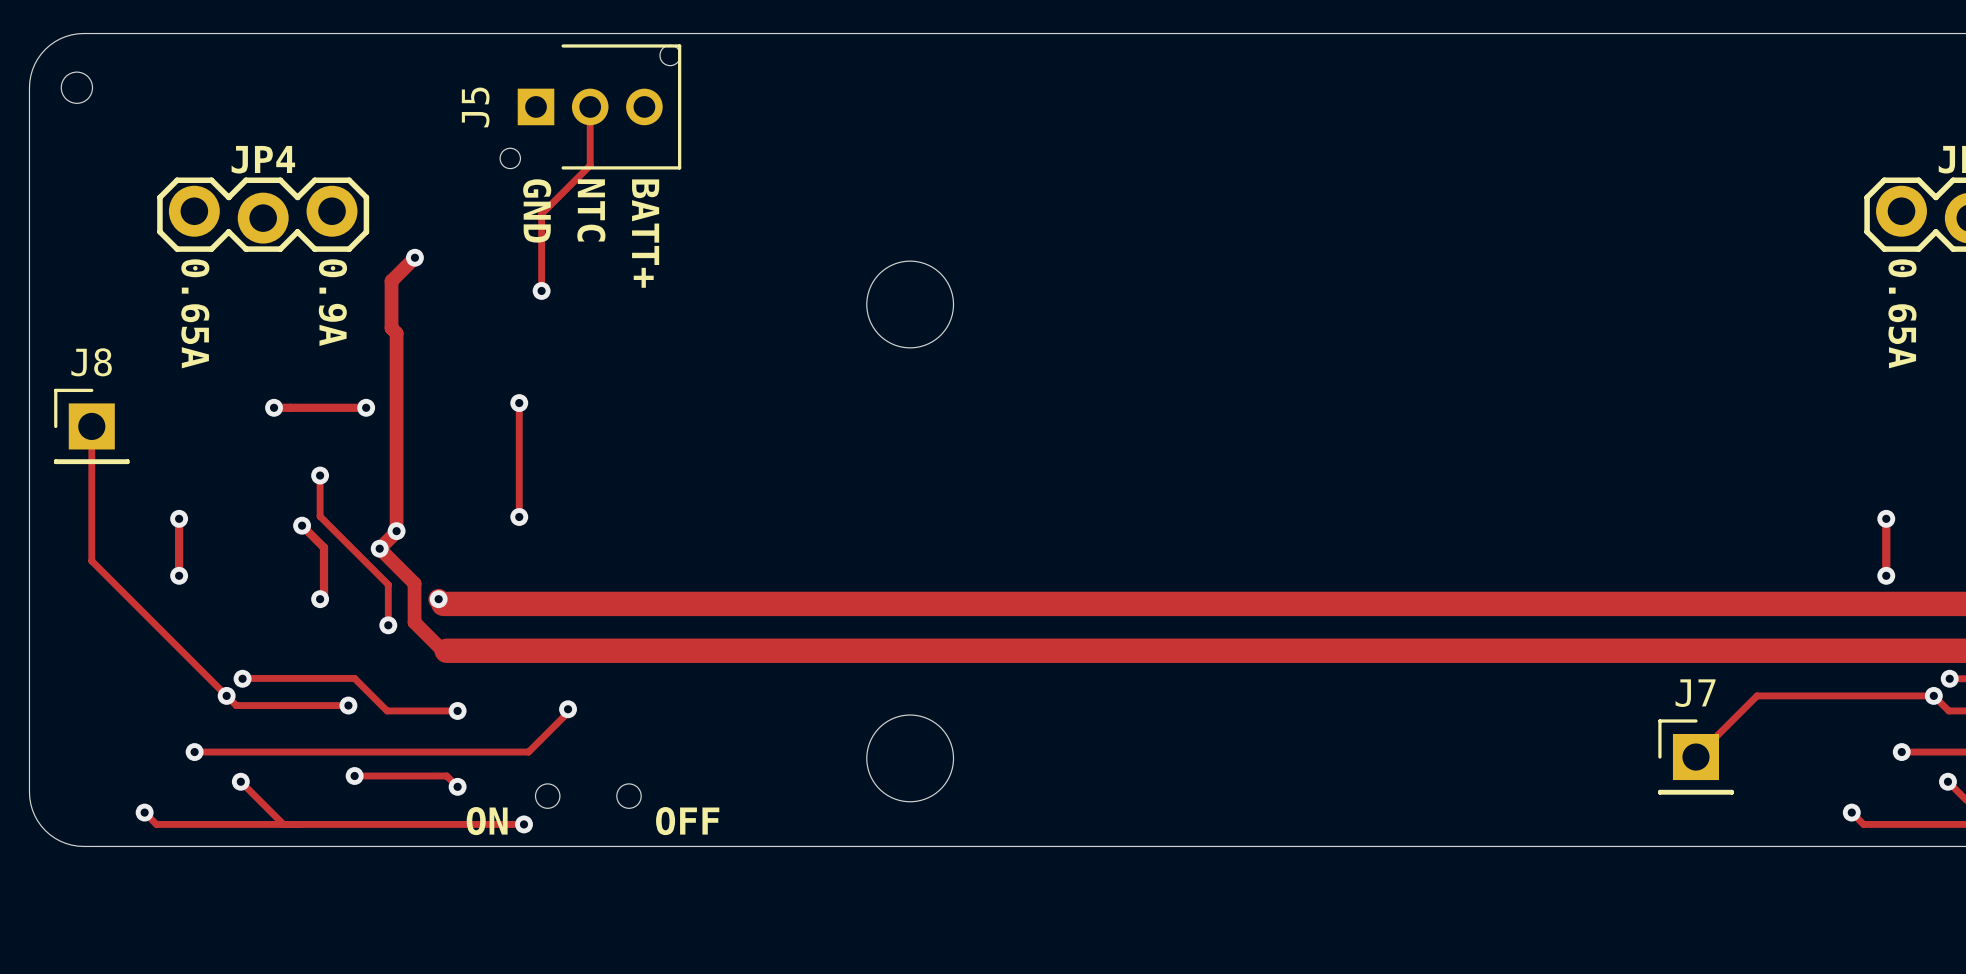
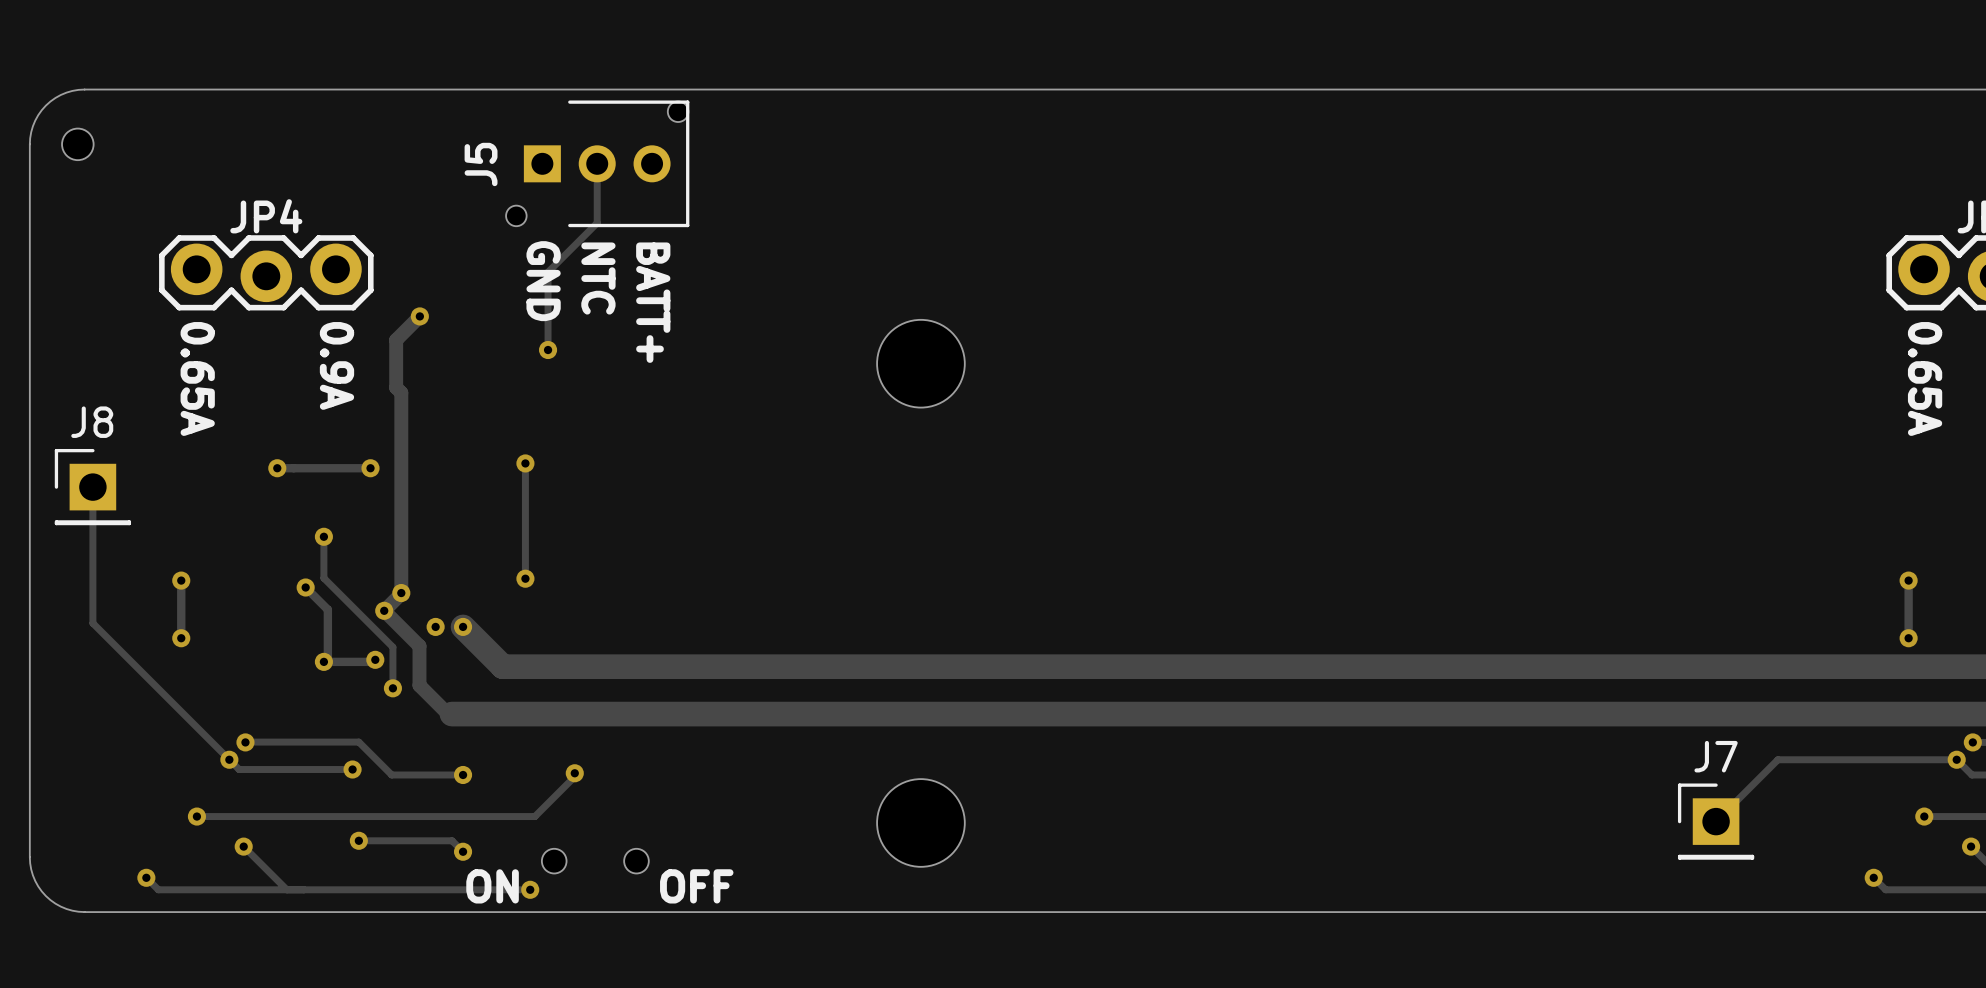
via: none -> (435, 626)
via: none -> (463, 626)
track: none -> (375, 659) (373, 661) (323, 661)
via: none -> (375, 659)
track: (438, 599) (443, 603) (496, 603) -> (463, 626) (502, 666)
via: (438, 599) -> none

